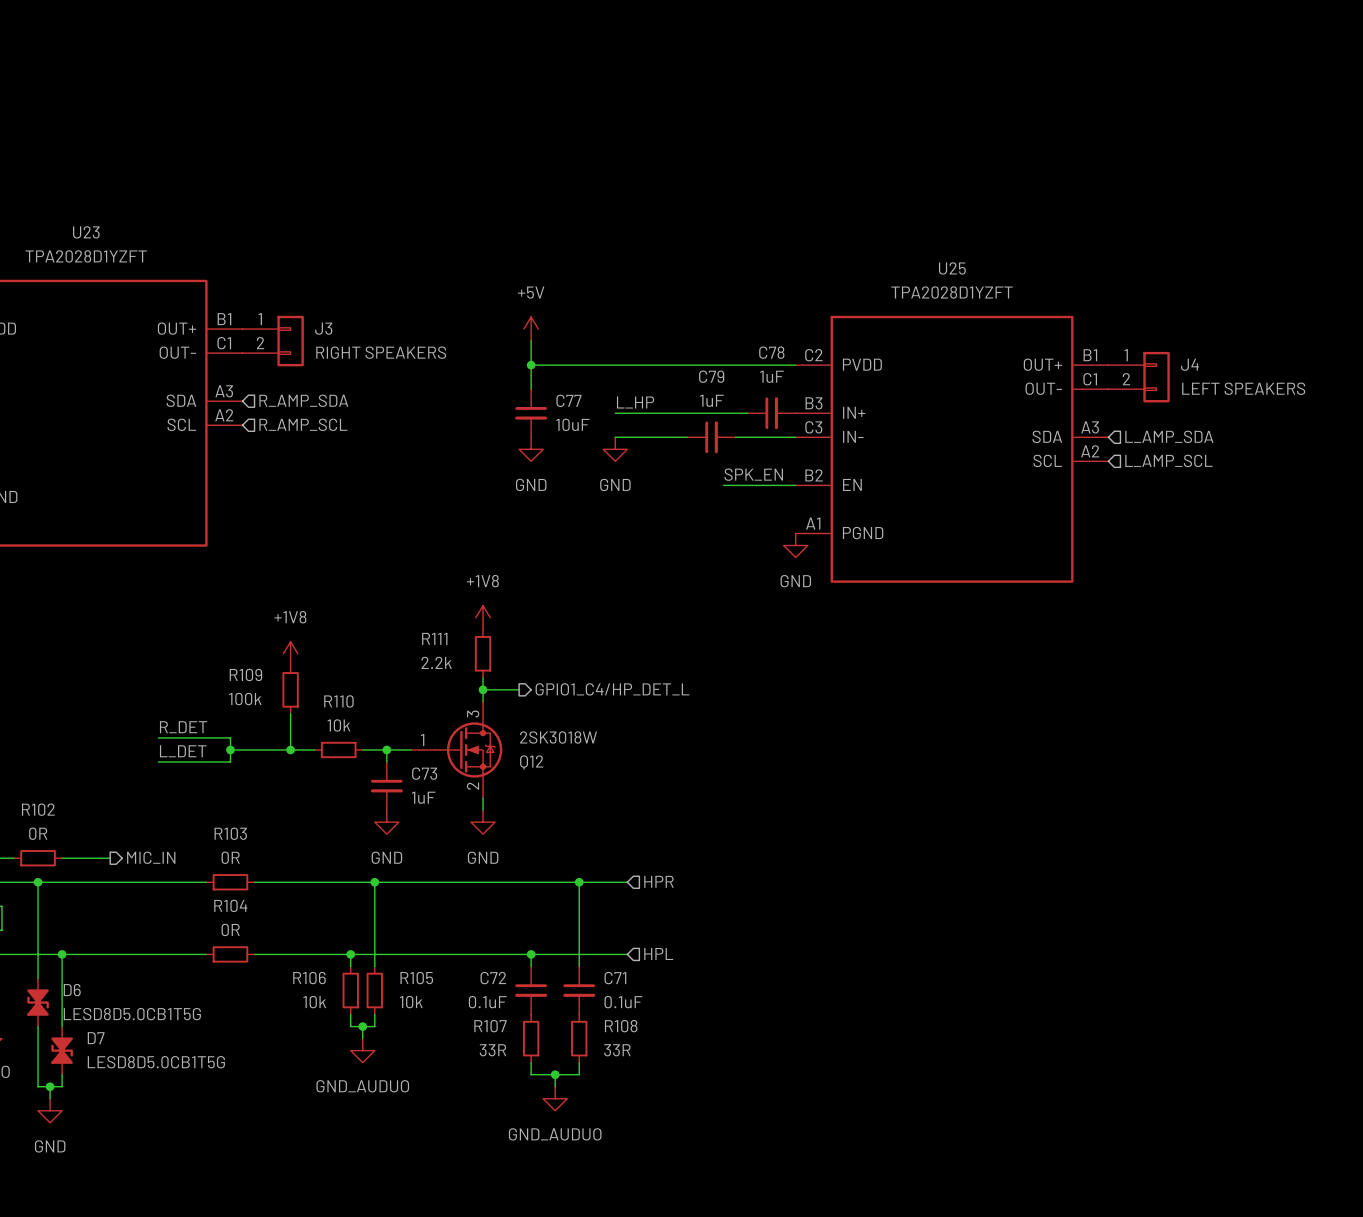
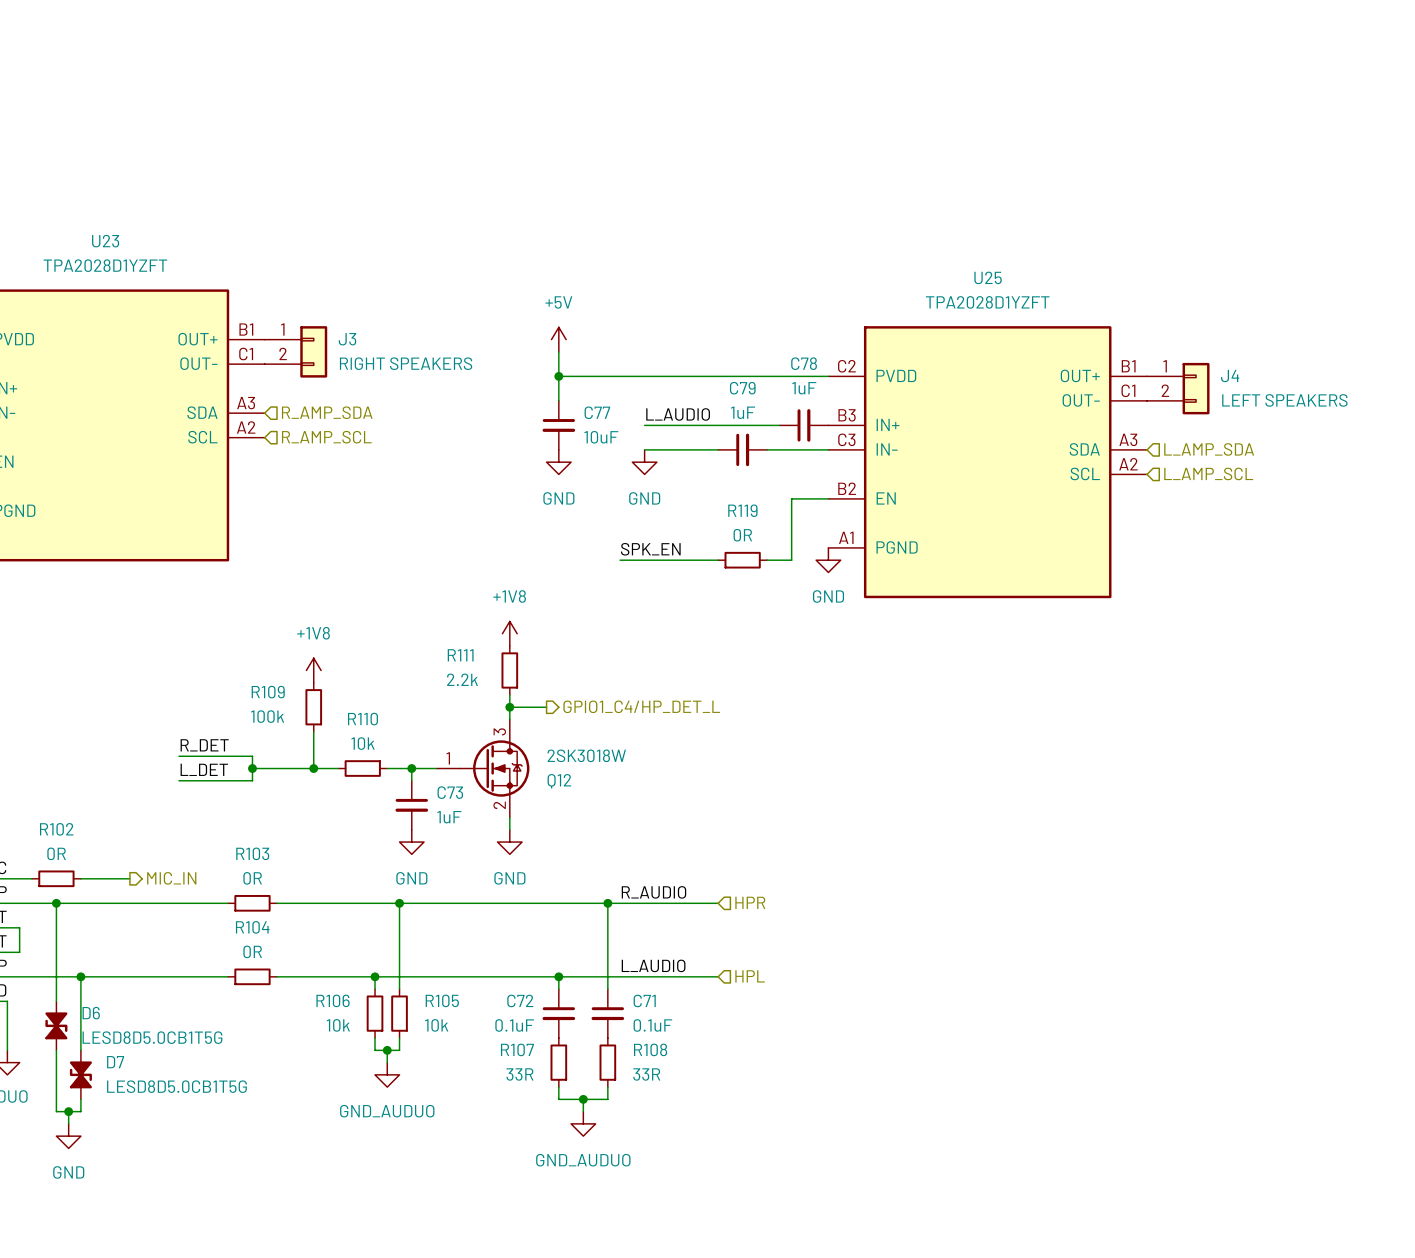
label: L_HP (635, 402) -> L_AUDIO (678, 414)
label position: SPK_EN (753, 474) -> SPK_EN (650, 549)
wire: (723, 485) (759, 485) -> (767, 560) (791, 560) (791, 498)
wire: none -> (620, 560) (718, 560)
R119: none -> 0R (742, 560)
label: none -> R_AUDIO (653, 892)
hierarchical label position: HPR (658, 881) -> HPR (750, 902)
wire: none -> (656, 903) (718, 903)
label: none -> L_AUDIO (653, 965)
hierarchical label position: HPL (658, 953) -> HPL (750, 976)
wire: none -> (656, 976) (718, 976)

